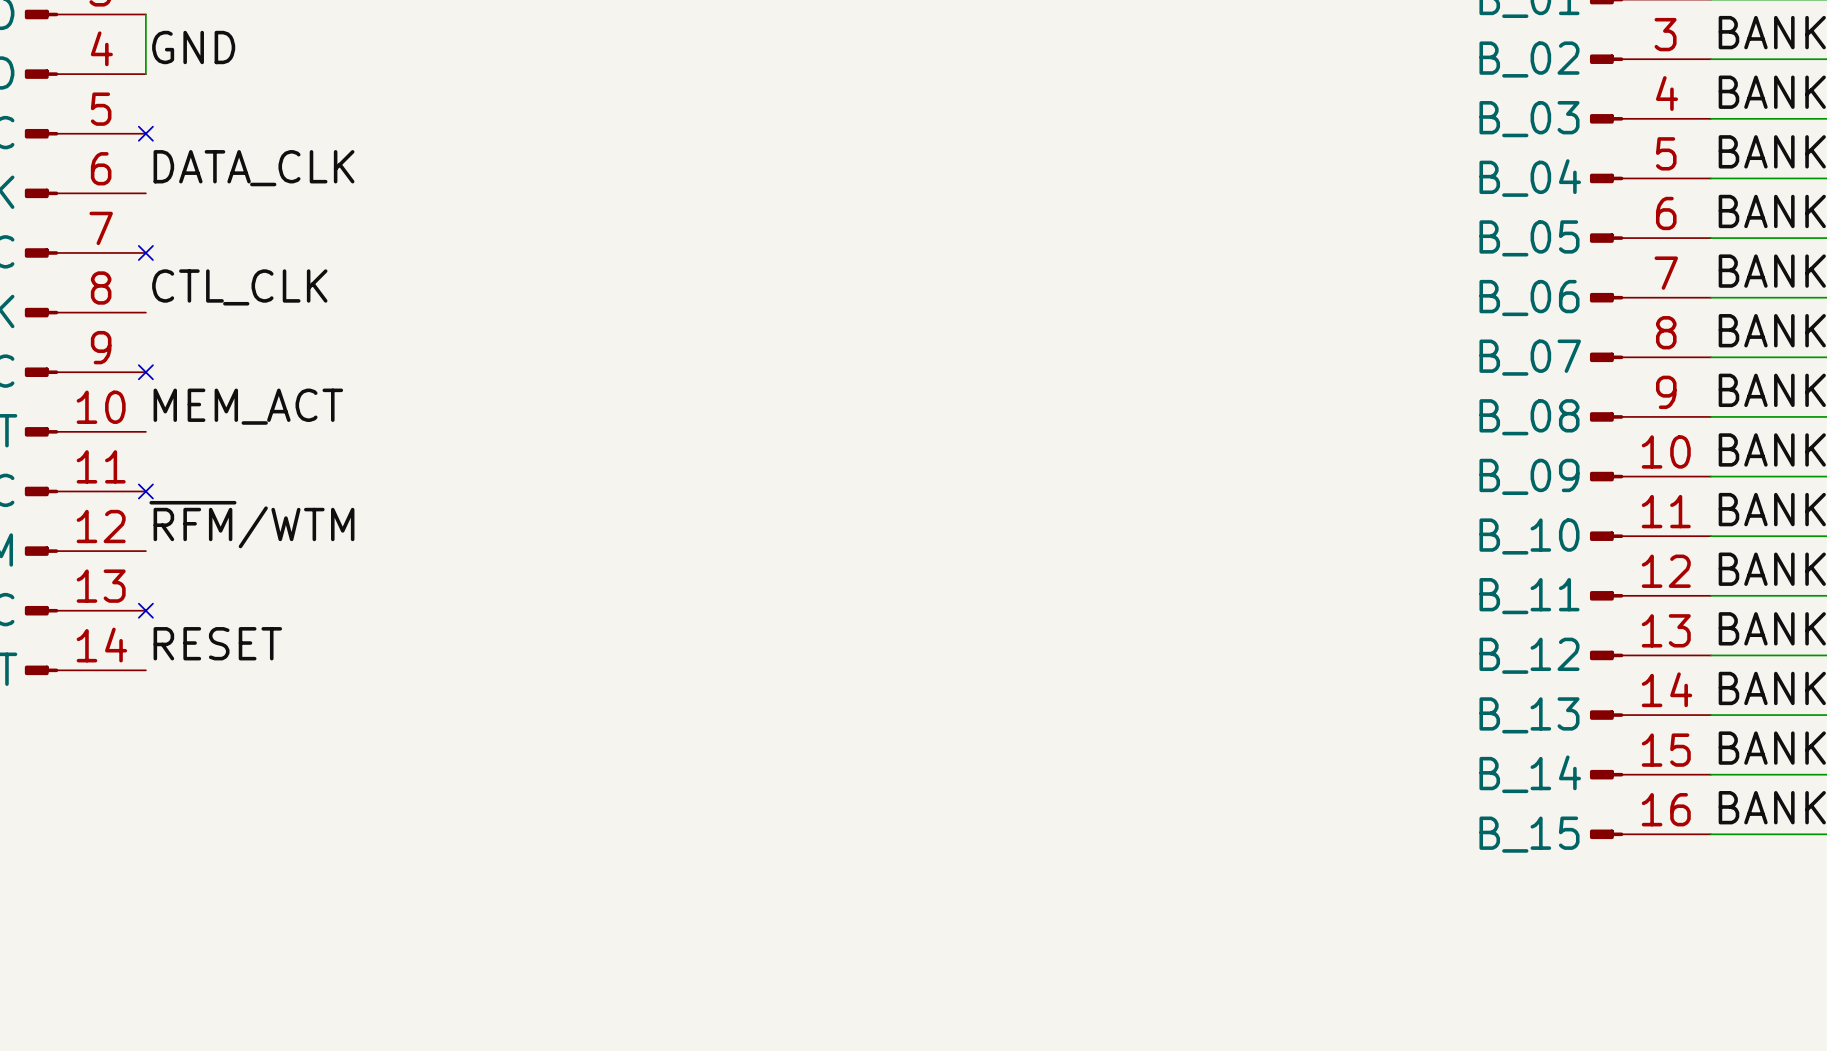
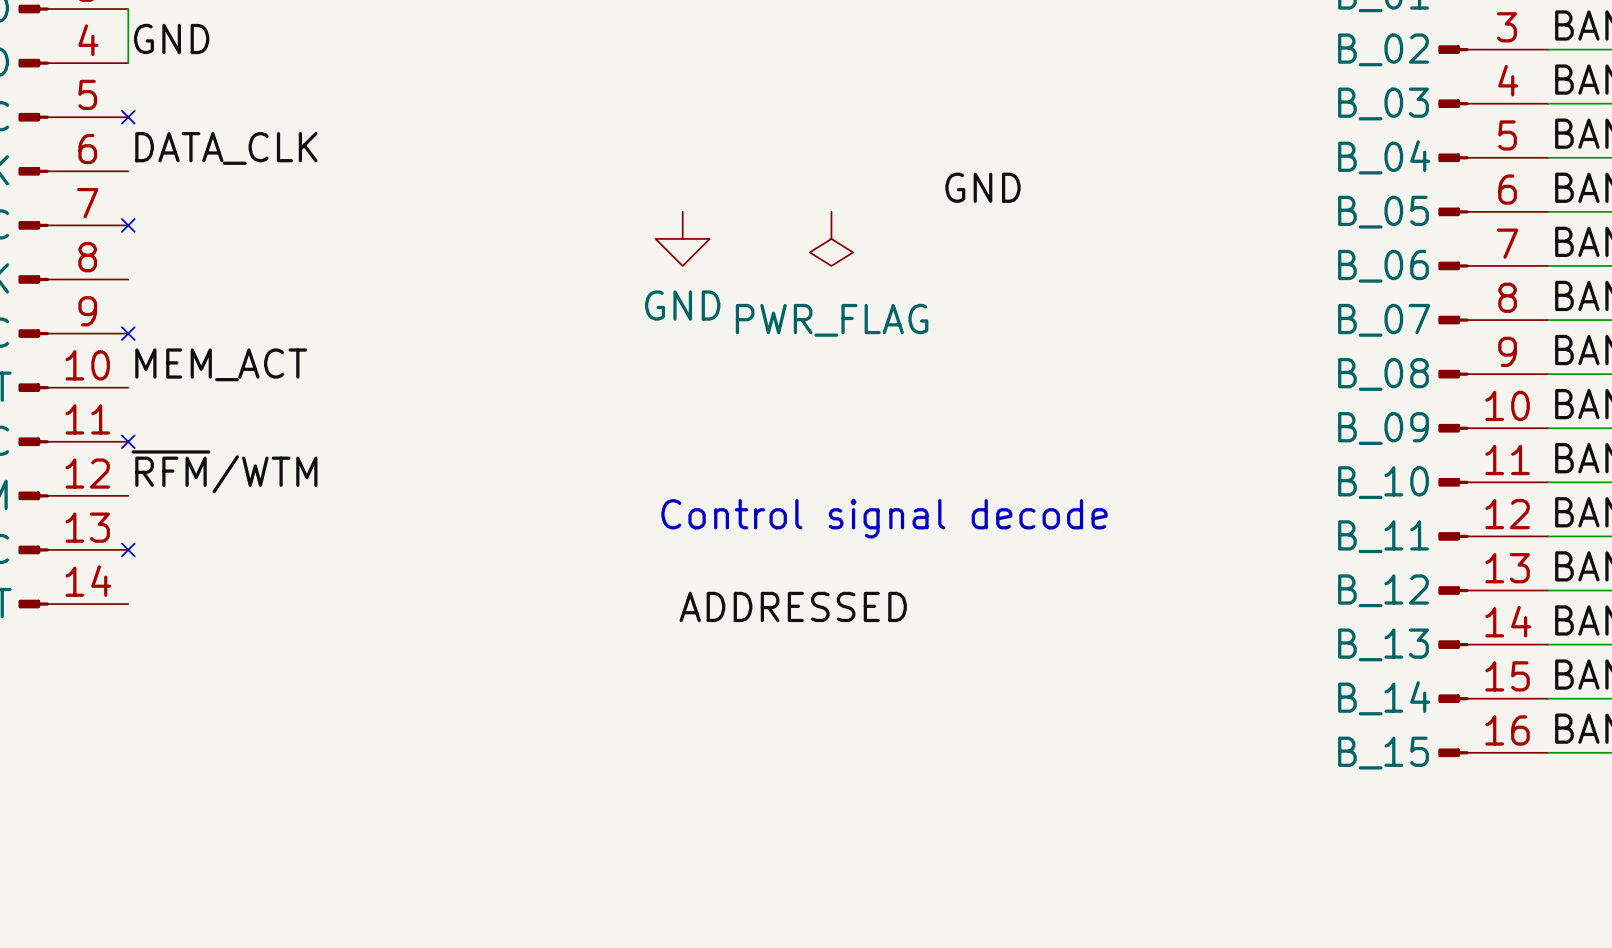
label: none -> GND (982, 187)
power symbol: none -> GND (682, 238)
power symbol: none -> PWR_FLAG (831, 238)
label: CTL_CLK (239, 287) -> none
text: none -> Control signal decode (884, 518)
label: RESET (217, 643) -> none
label: none -> ADDRESSED (793, 606)

